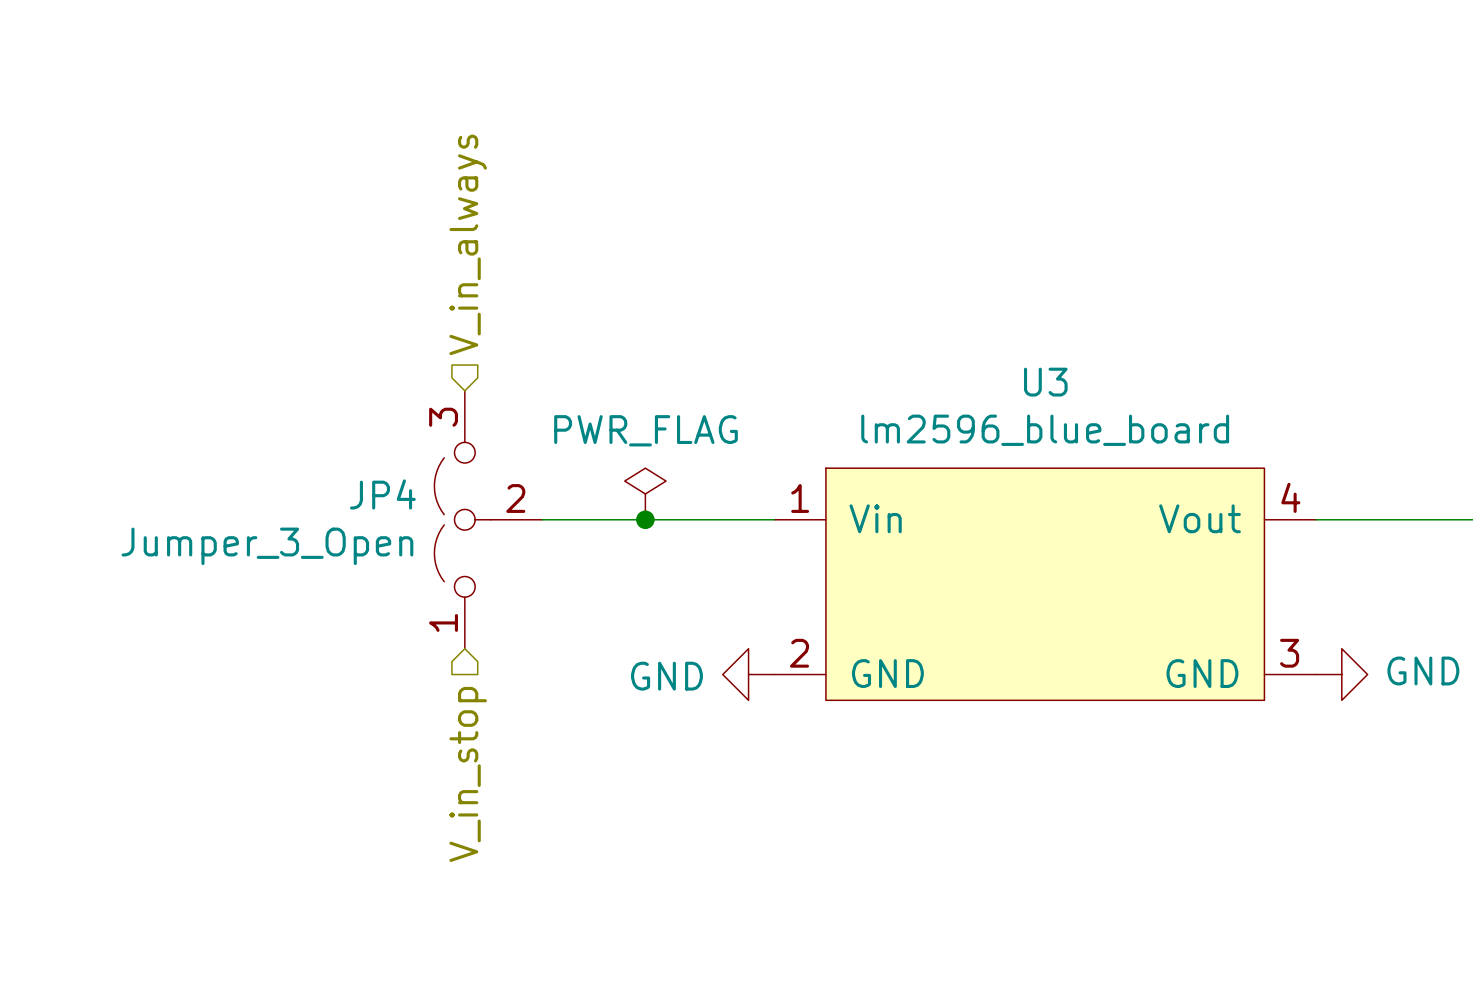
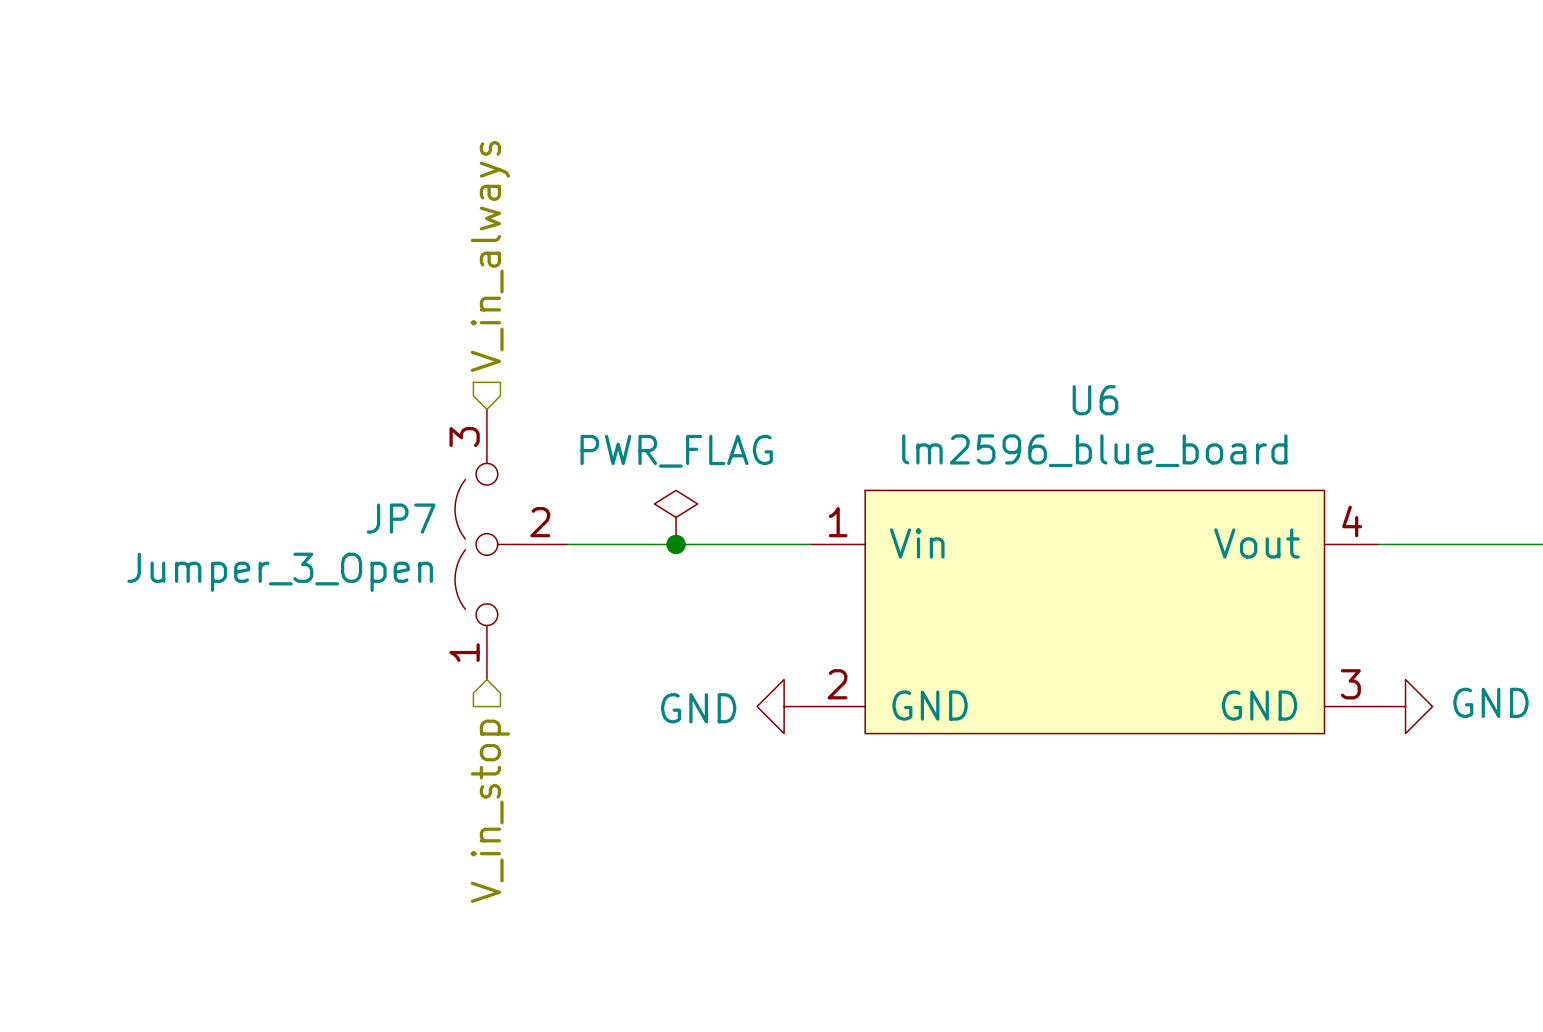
U3 name: U3 (1045, 382) -> U6 (1095, 400)
JP4 name: JP4 (382, 494) -> JP7 (401, 518)

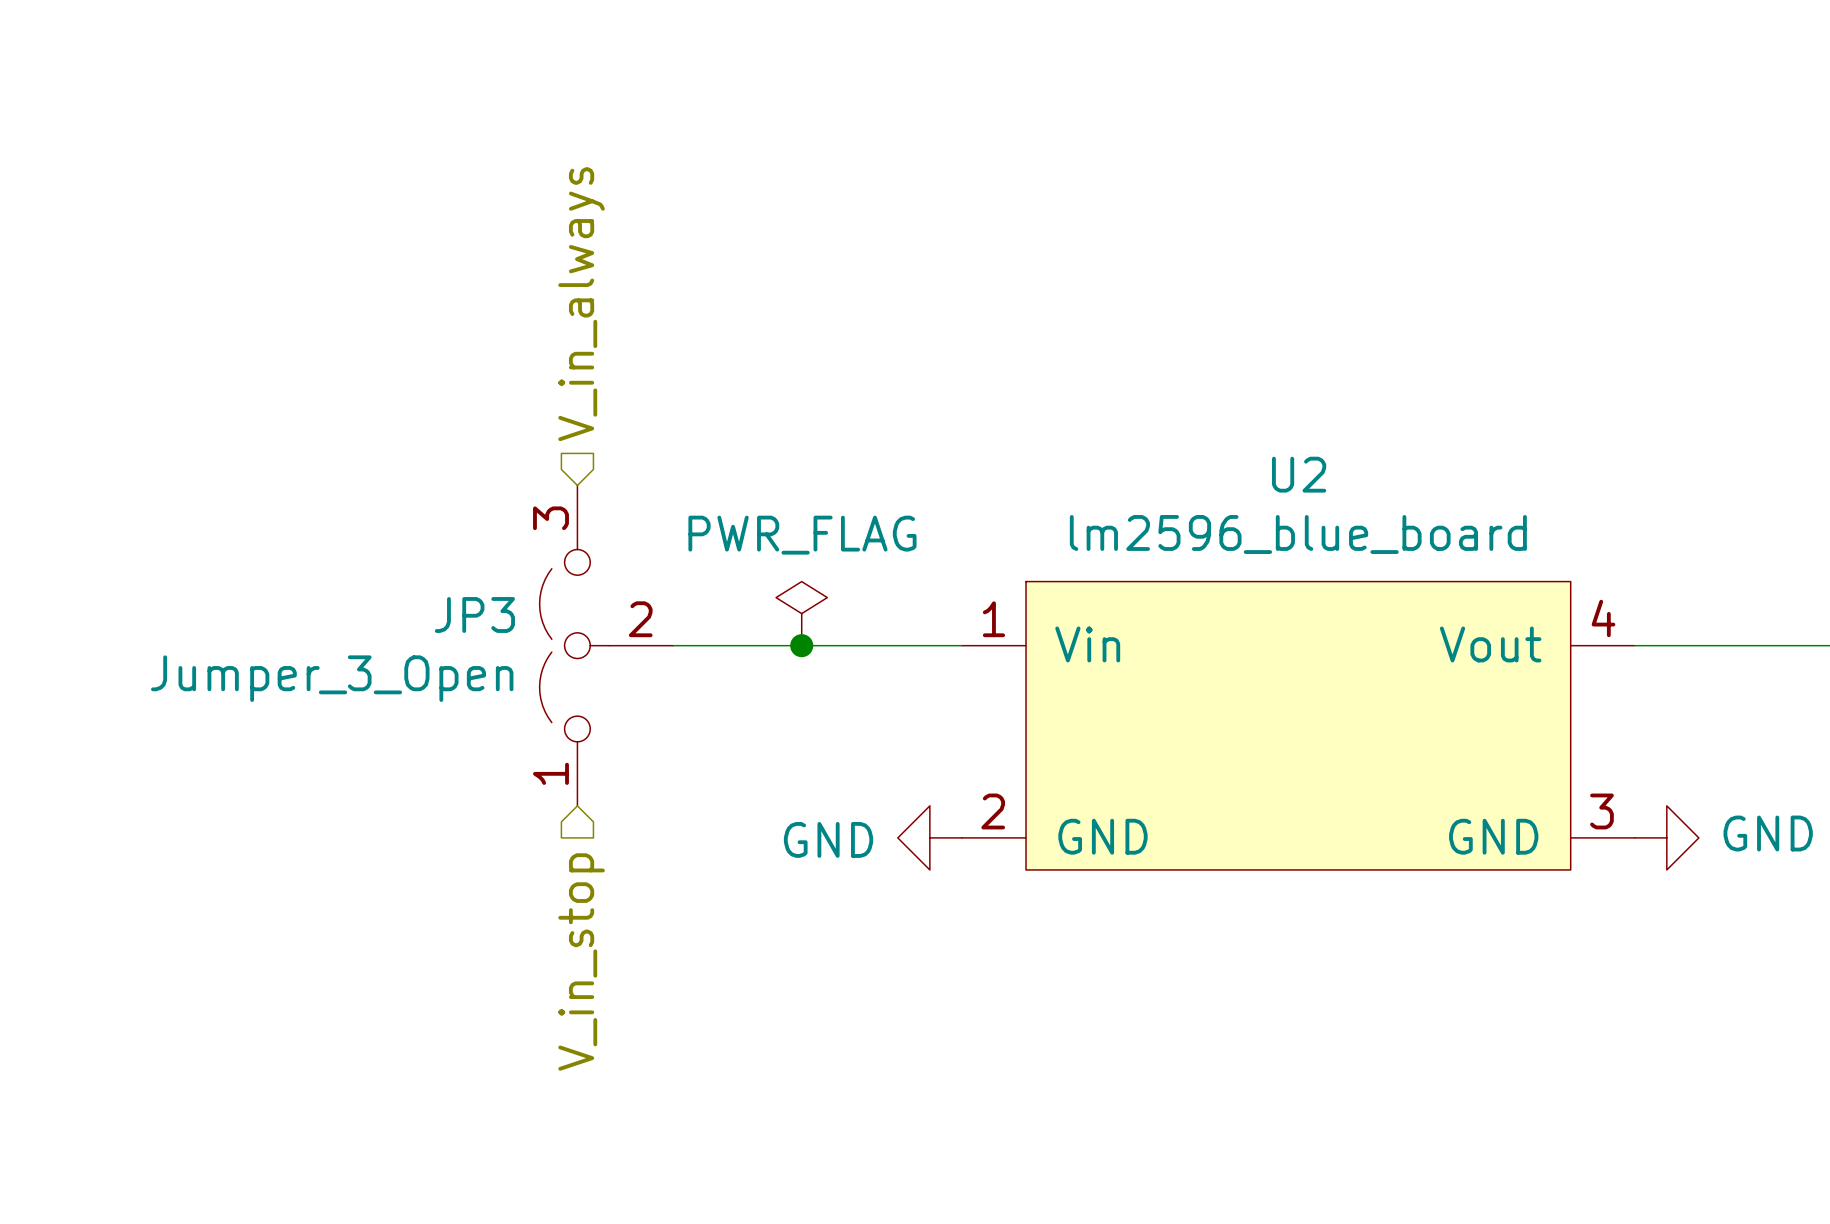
U6 name: U6 (1095, 400) -> U2 (1299, 474)
JP7 name: JP7 (401, 518) -> JP3 (474, 614)

